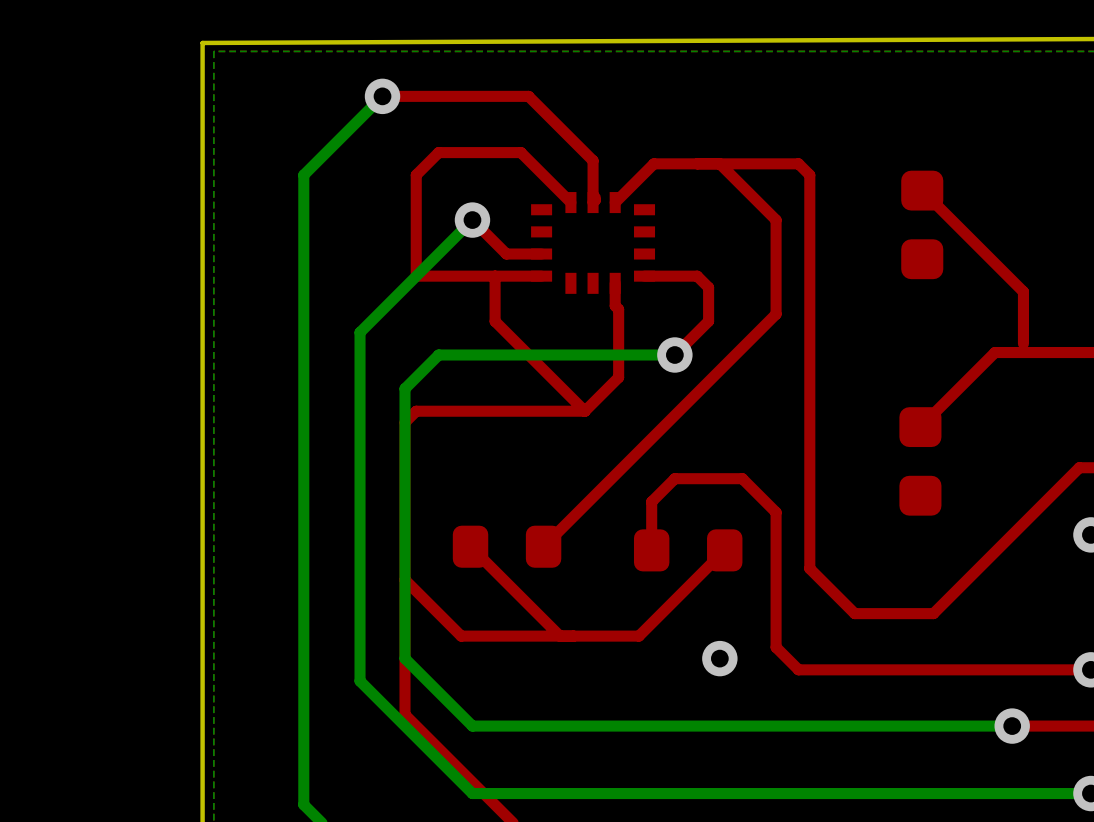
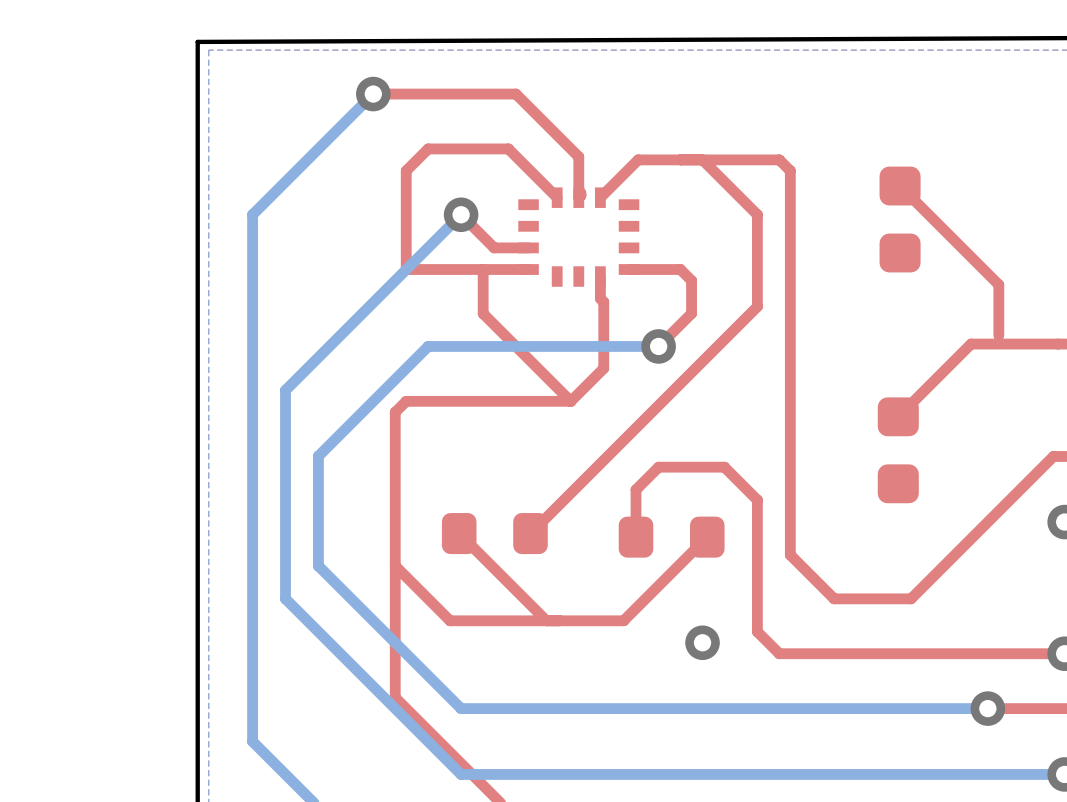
bottom track: (303, 175) (303, 804) -> (296, 170) (252, 214) (252, 741) (296, 785)
bottom track: (360, 332) (360, 681) -> (351, 324) (285, 390) (285, 598) (351, 664)
bottom track: (405, 388) (405, 658) -> (395, 379) (318, 456) (318, 565) (395, 642)

